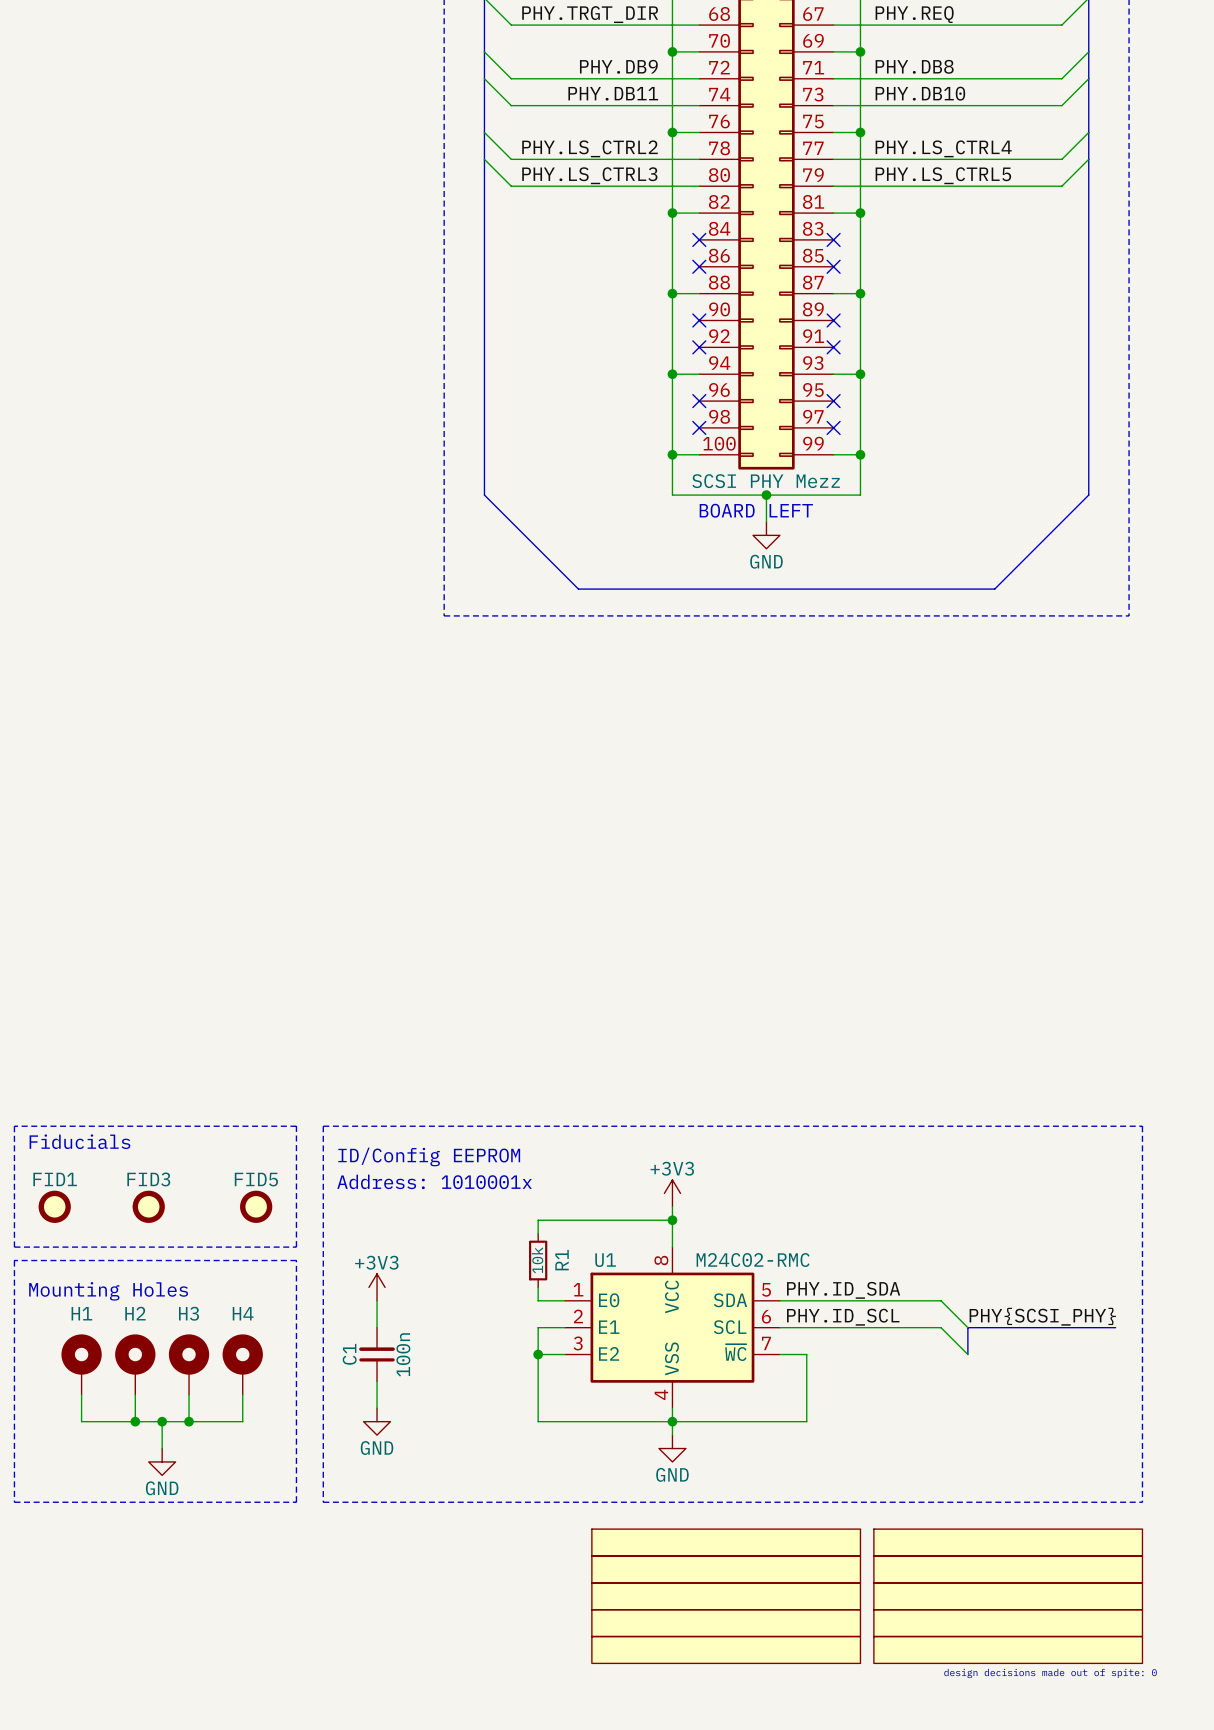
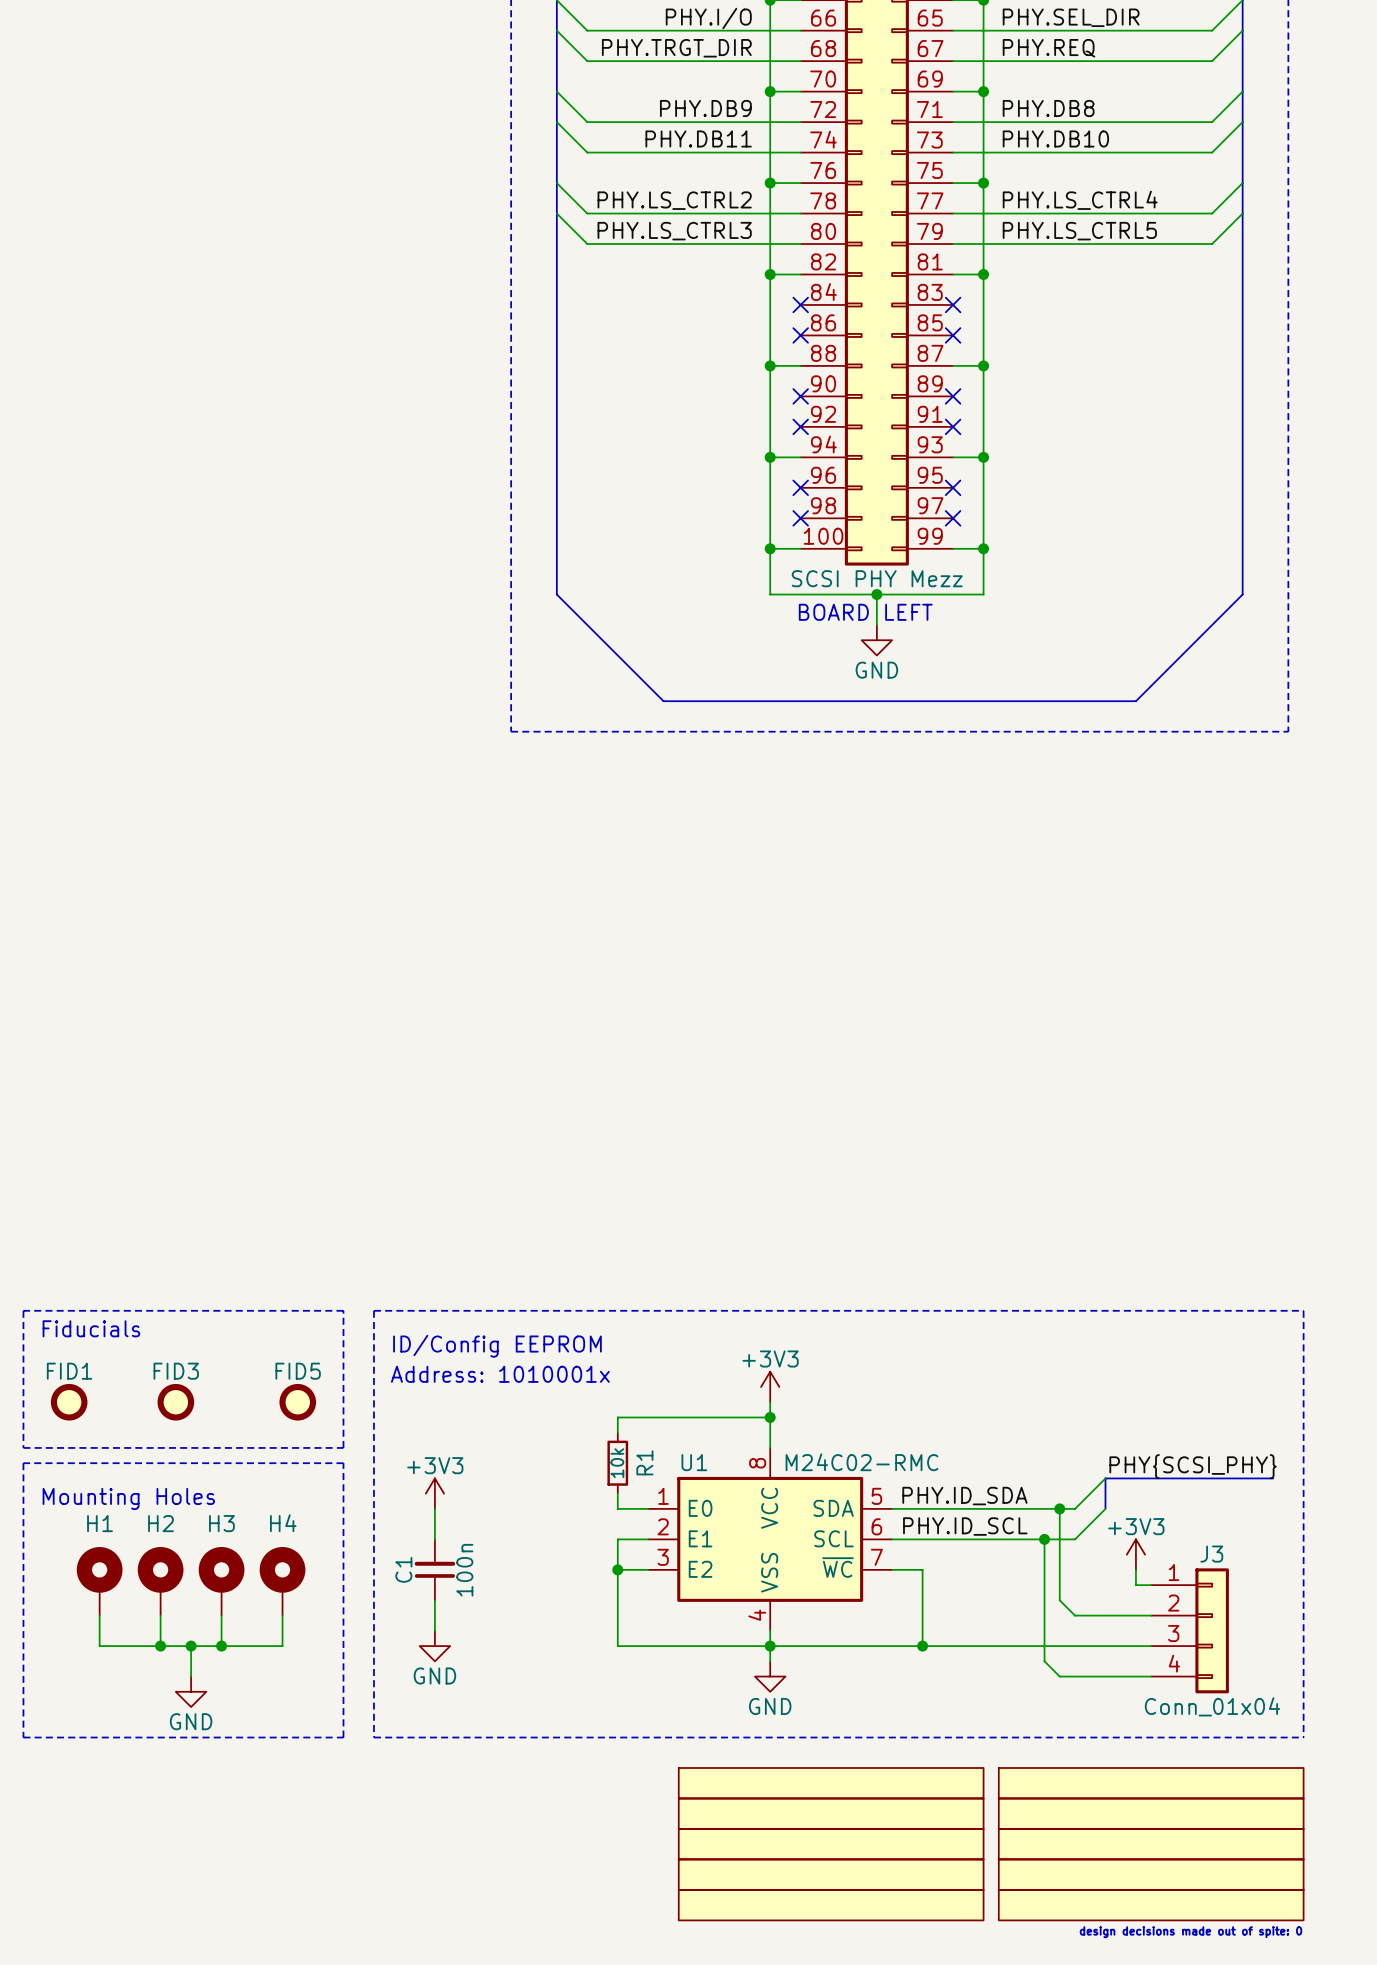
wire: none -> (1059, 1508) (1059, 1600) (1075, 1615) (1151, 1615)
junction: none -> (1059, 1508)
wire: (941, 1300) (967, 1327) -> (1075, 1508) (1105, 1478)
label position: PHY{SCSI_PHY} (1042, 1316) -> PHY{SCSI_PHY} (1193, 1466)
wire: none -> (1044, 1539) (1044, 1661) (1059, 1676) (1151, 1676)
junction: none -> (1044, 1539)
wire: (941, 1327) (967, 1354) -> (1075, 1539) (1105, 1508)
bus: (1115, 1327) (967, 1327) (967, 1354) -> (1273, 1478) (1105, 1478) (1105, 1508)
power symbol: none -> +3V3 (1135, 1554)
wire: none -> (1135, 1569) (1135, 1585) (1151, 1585)
J3: none -> Conn_01x04 (1190, 1630)
wire: none -> (922, 1646) (1151, 1646)
junction: none -> (922, 1646)

